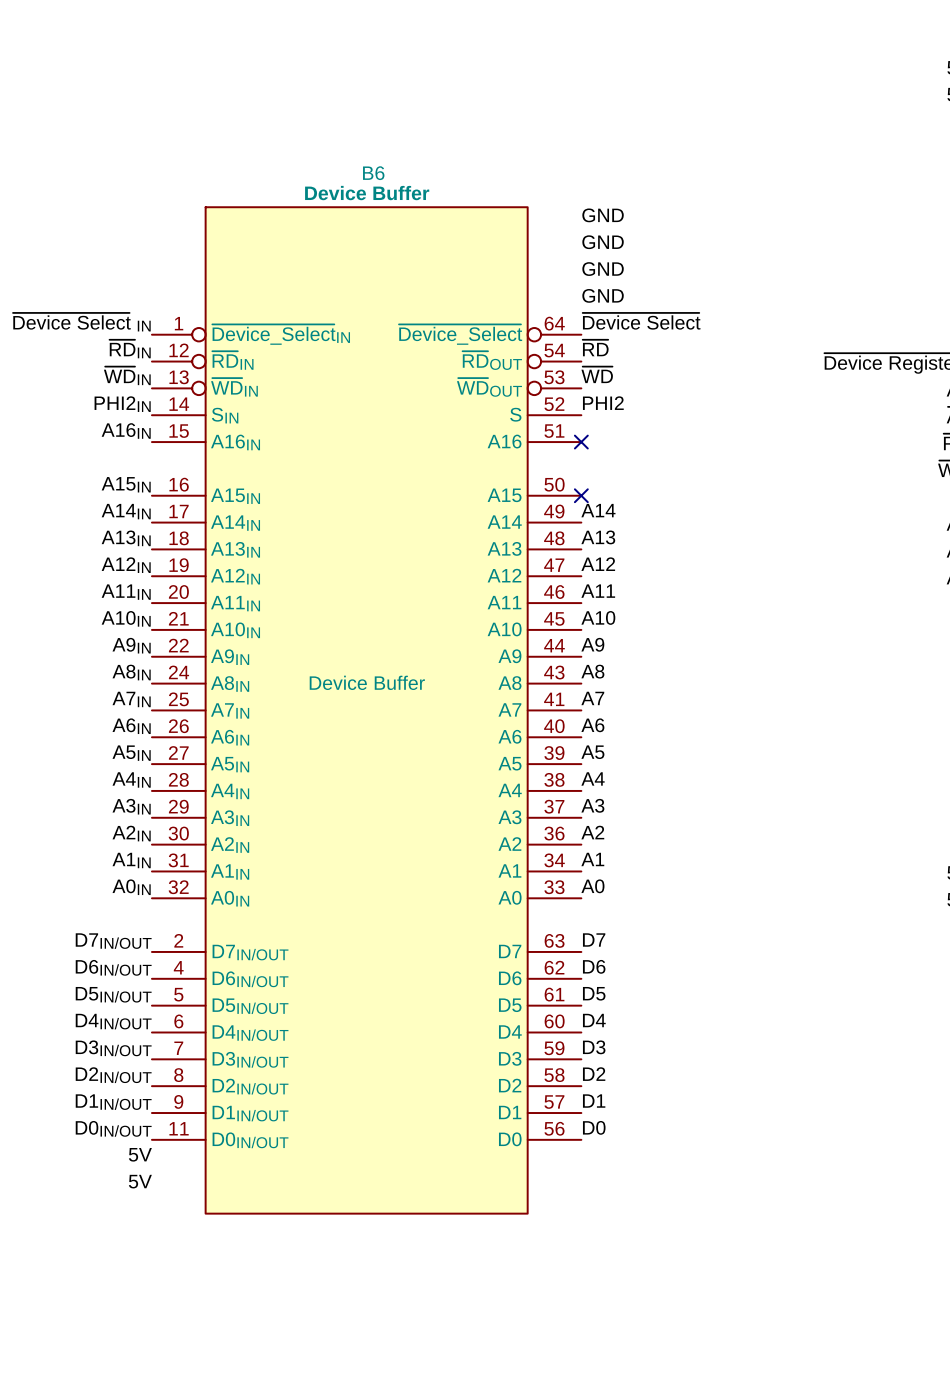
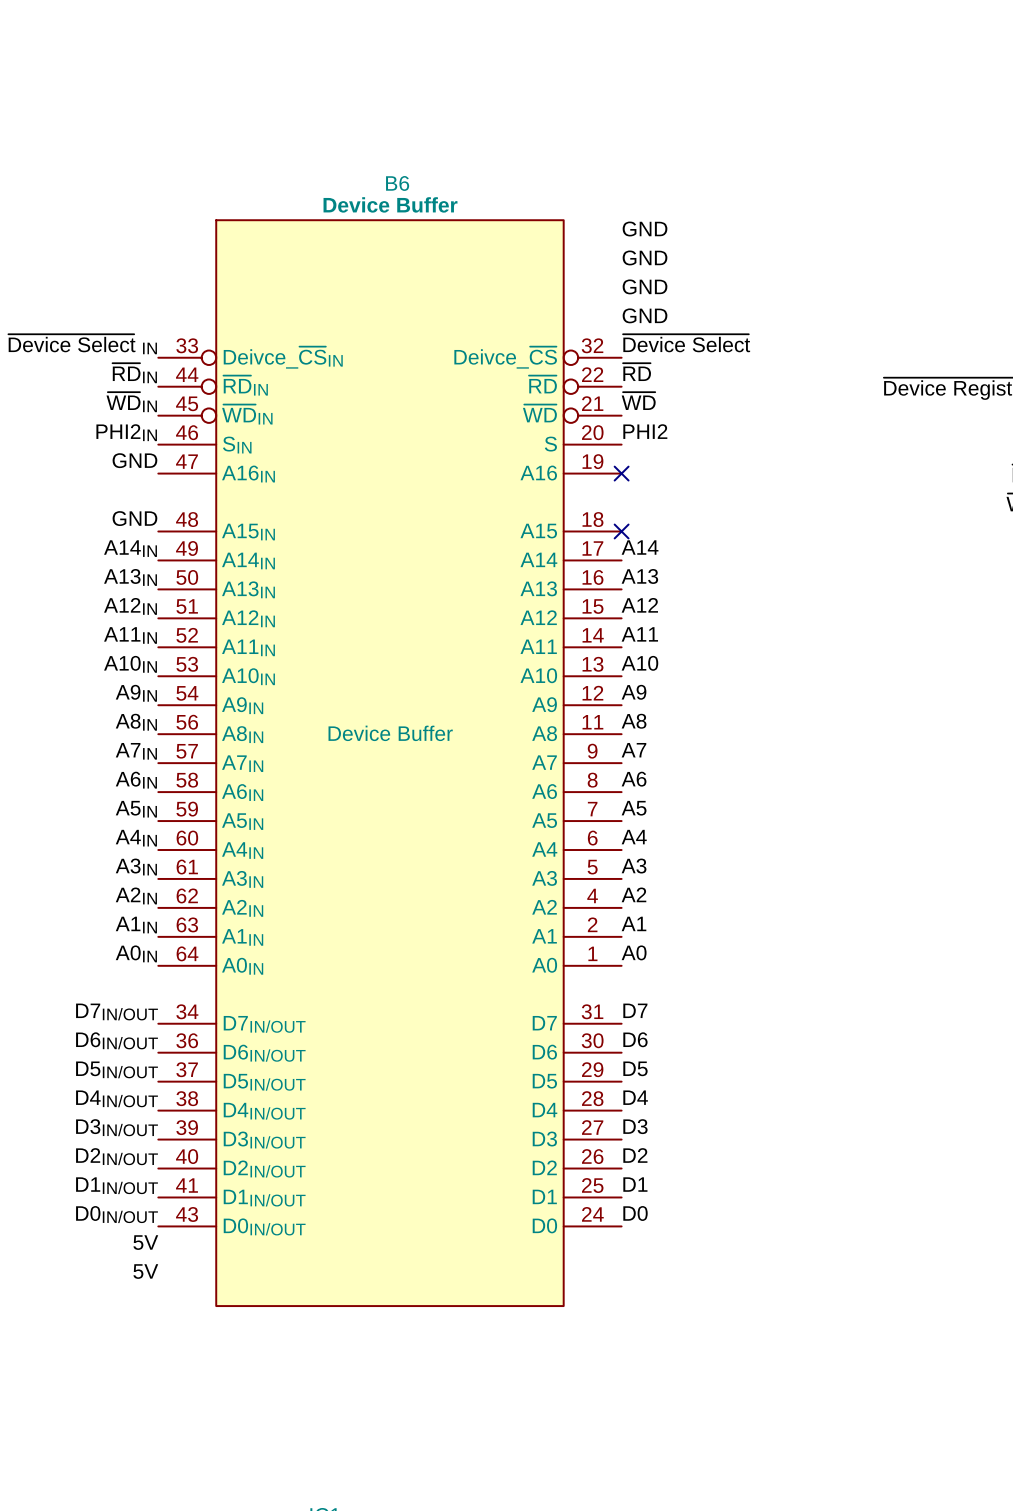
B6 symbol: [151, 206, 582, 1215] -> [158, 219, 622, 1307]
label: A16IN (126, 430) -> GND (134, 460)
label: A15IN (126, 484) -> GND (134, 518)

